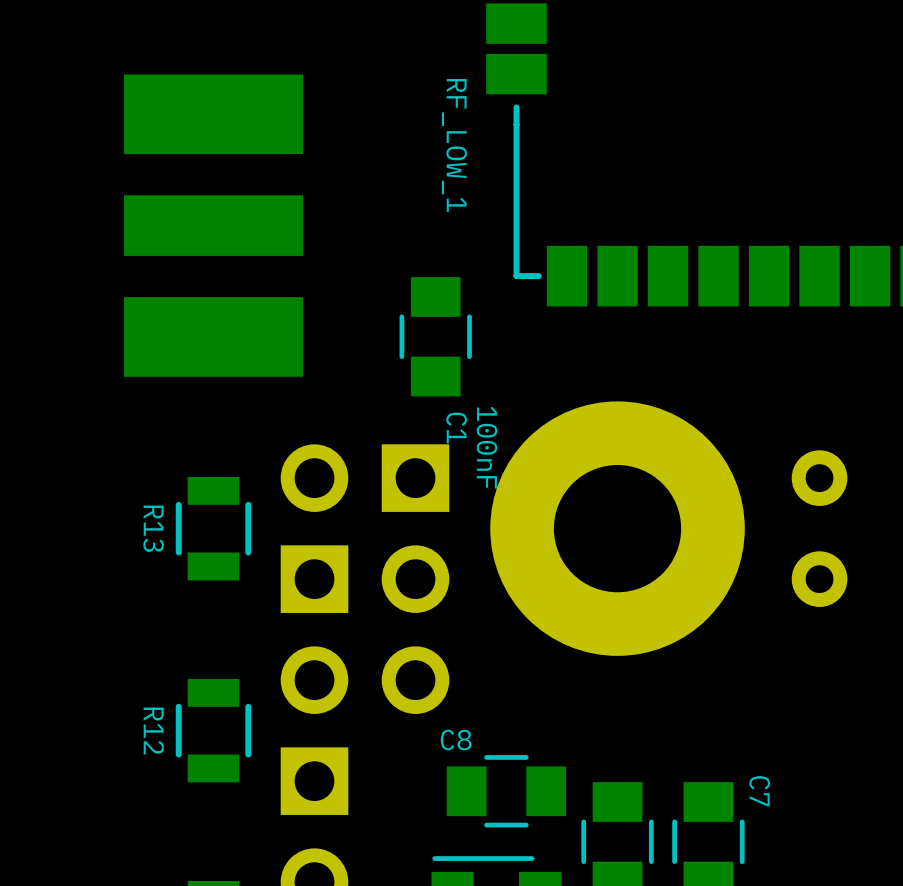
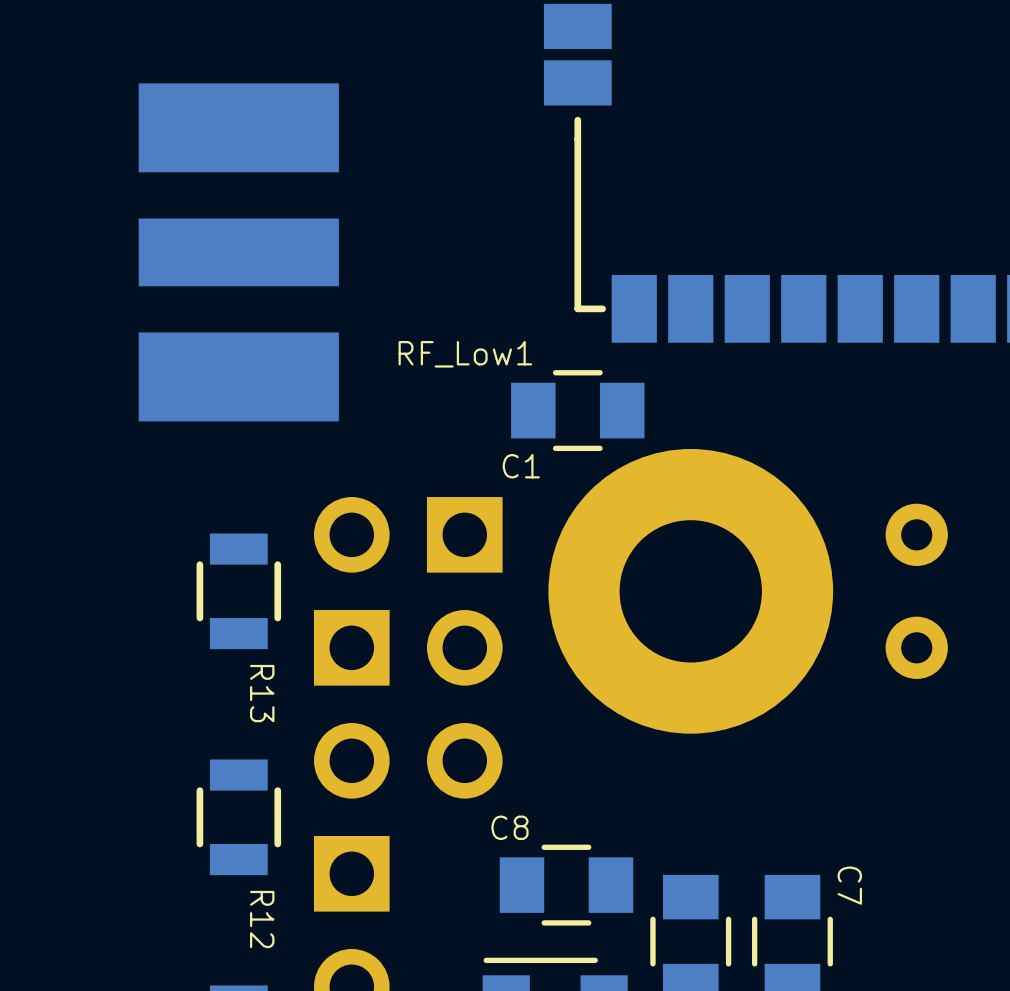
RF_LOW_1 name: RF_LOW_1 (454, 145) -> RF_Low1 (465, 354)
C1 rotation: 0° (435, 336) -> 90° clockwise (577, 410)
C1 position: (435, 336) -> (577, 410)
C1 value: 100nF (486, 447) -> none
R13 name position: R13 (153, 528) -> R13 (262, 693)
R12 name position: R12 (153, 731) -> R12 (262, 919)

